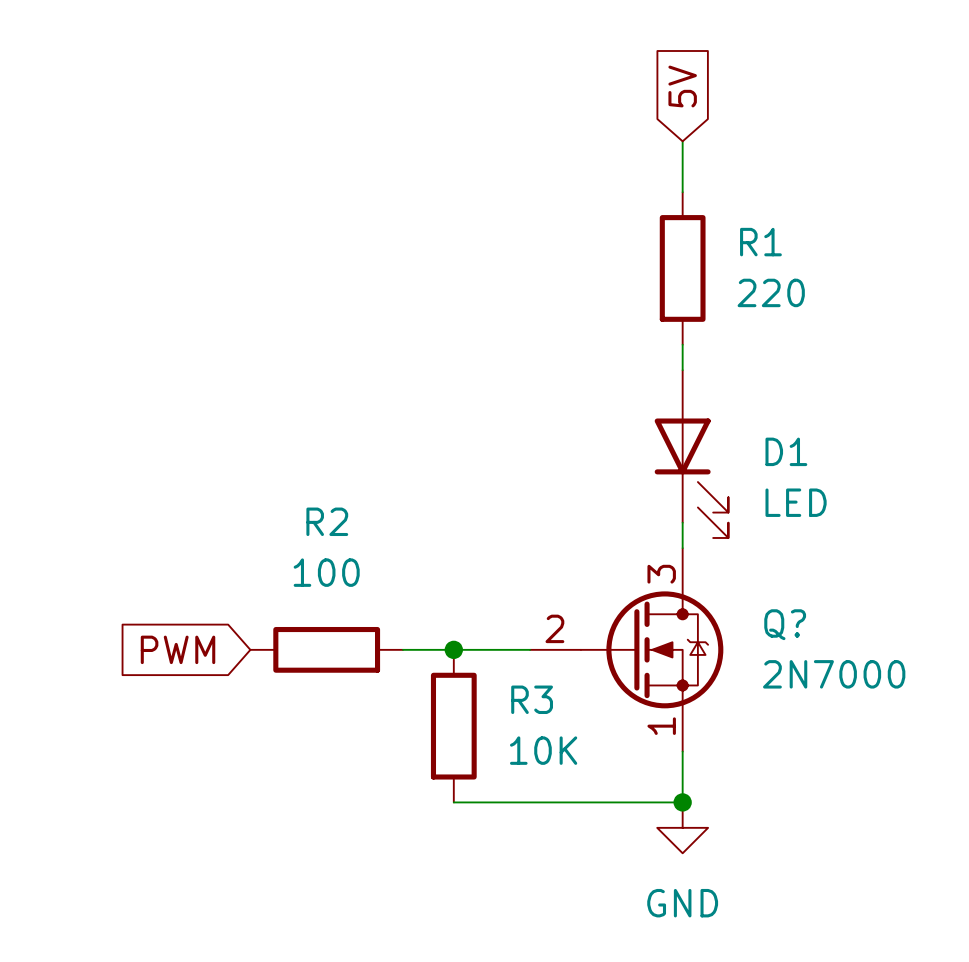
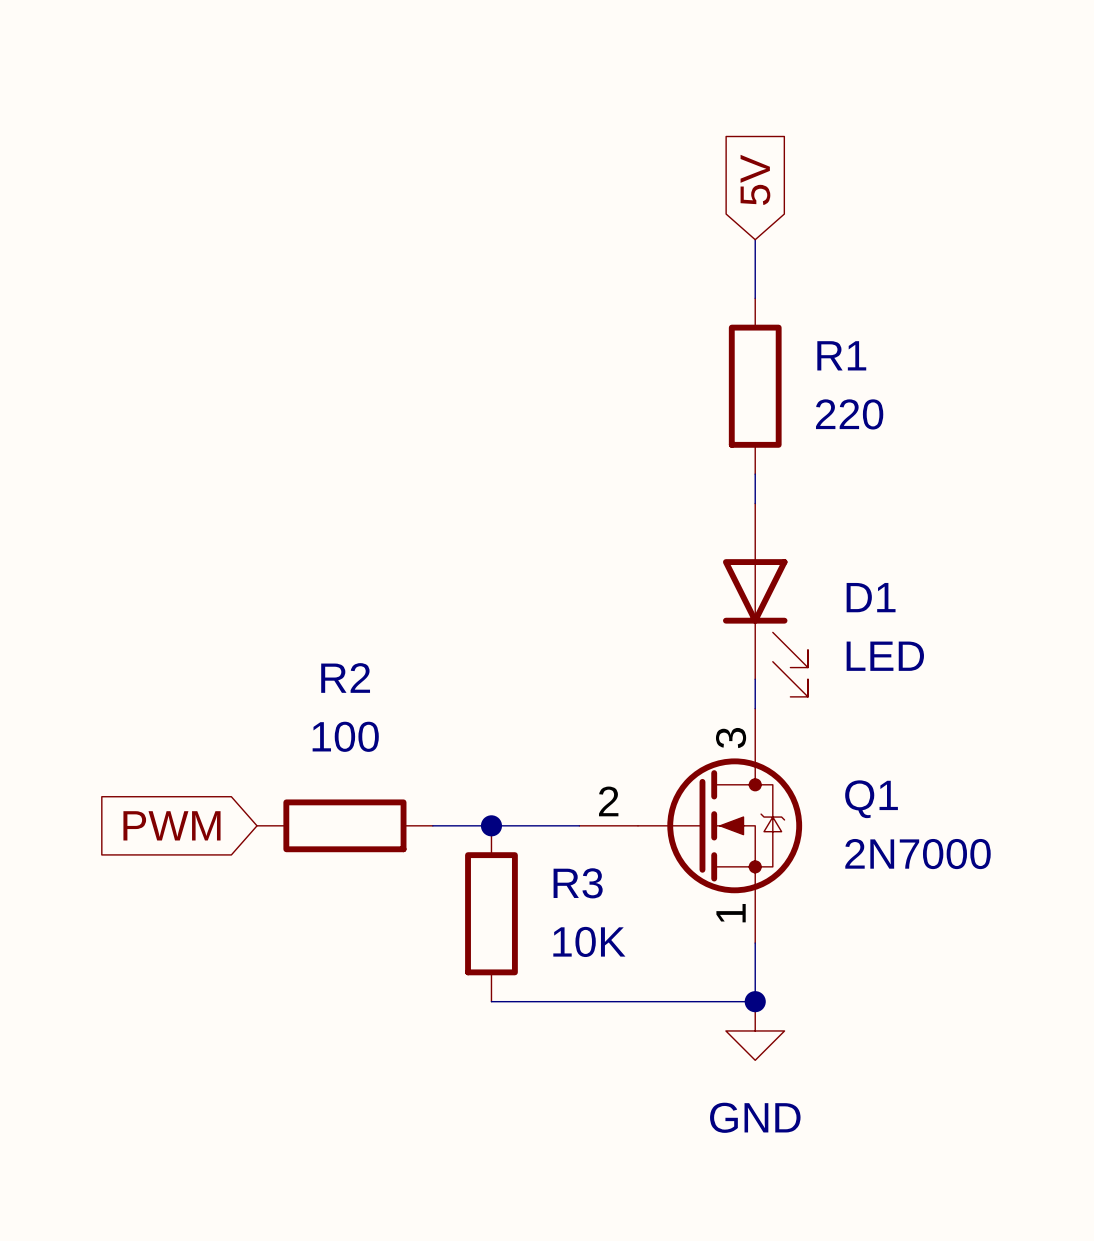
Q? name: Q? (785, 624) -> Q1 (871, 799)

